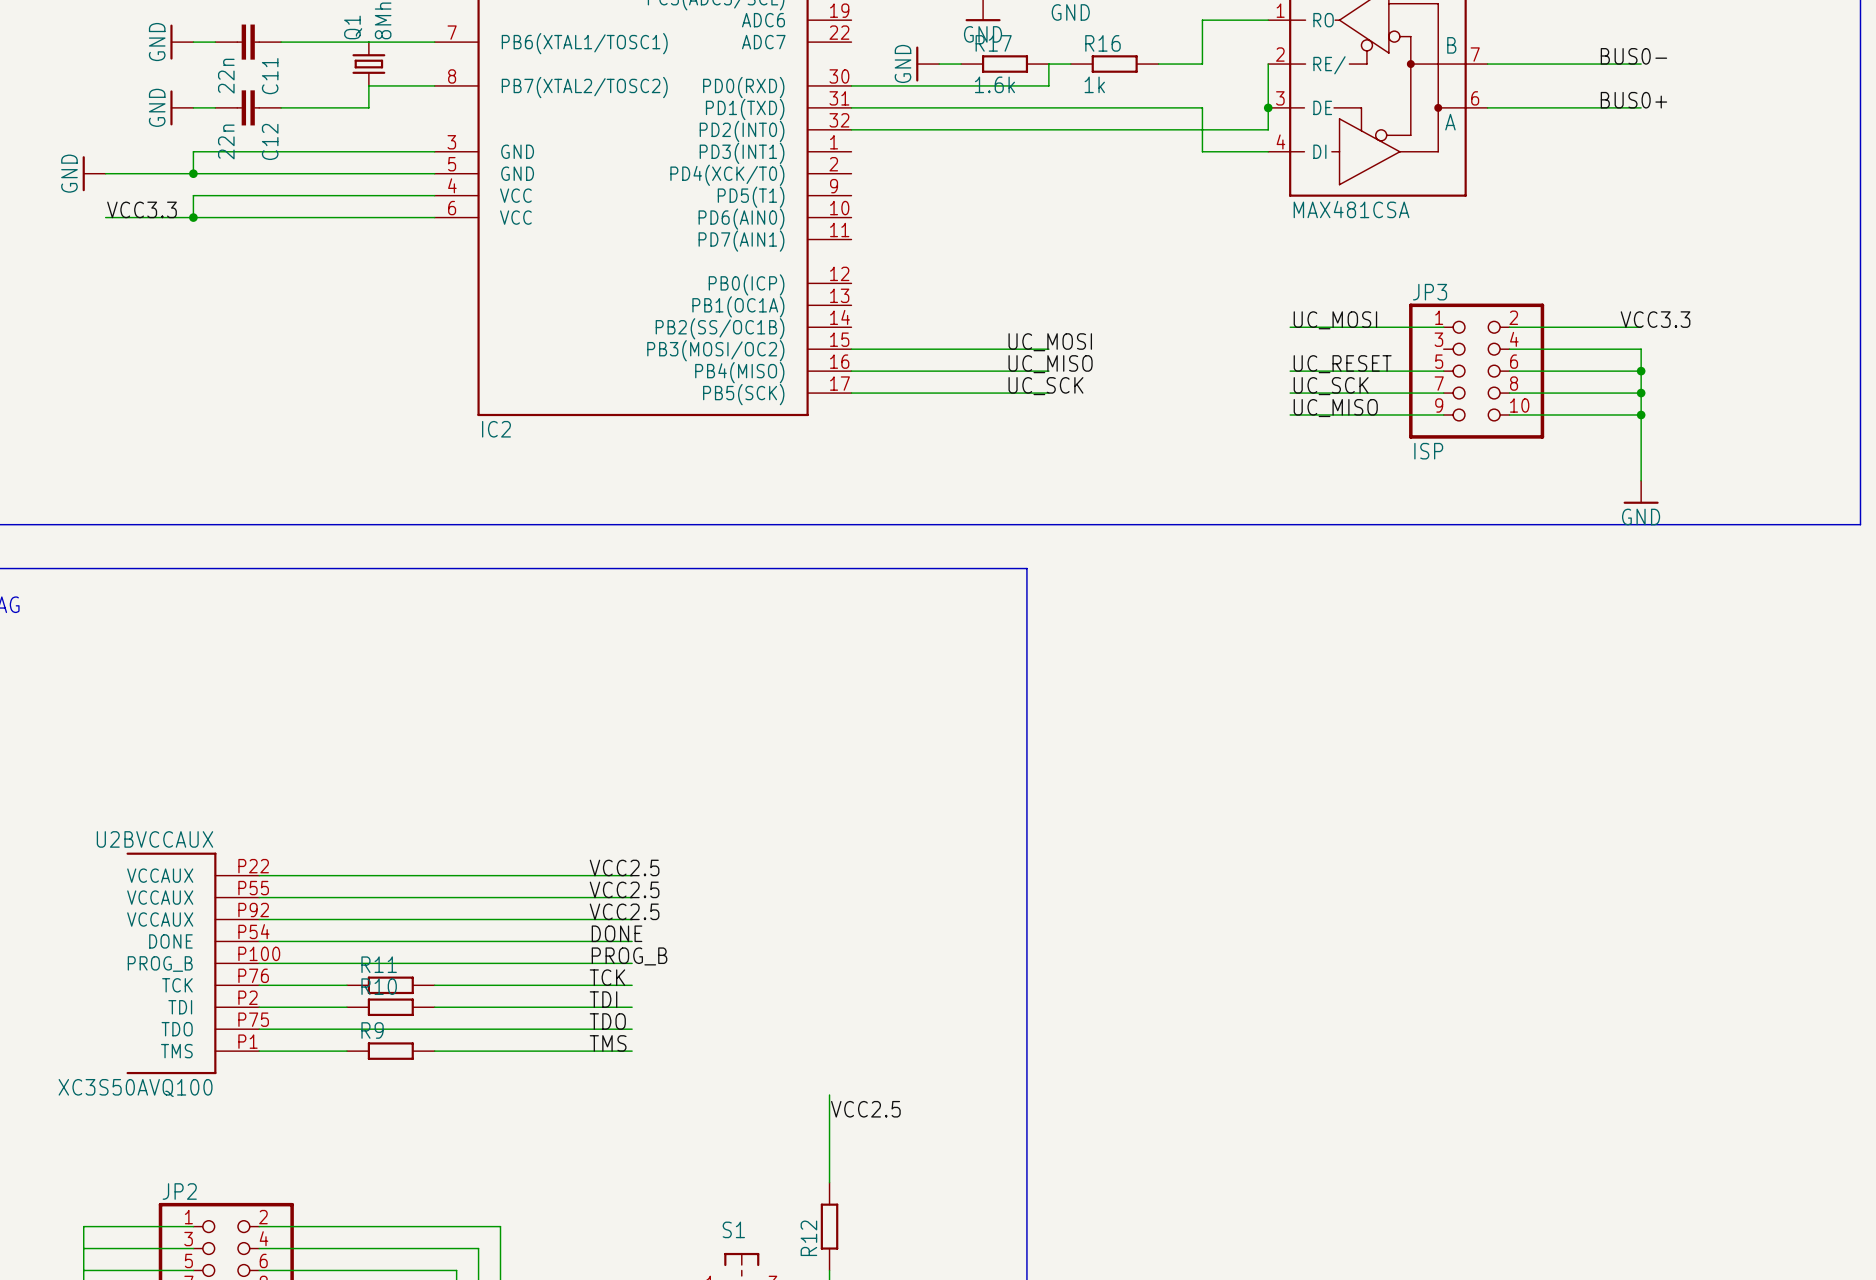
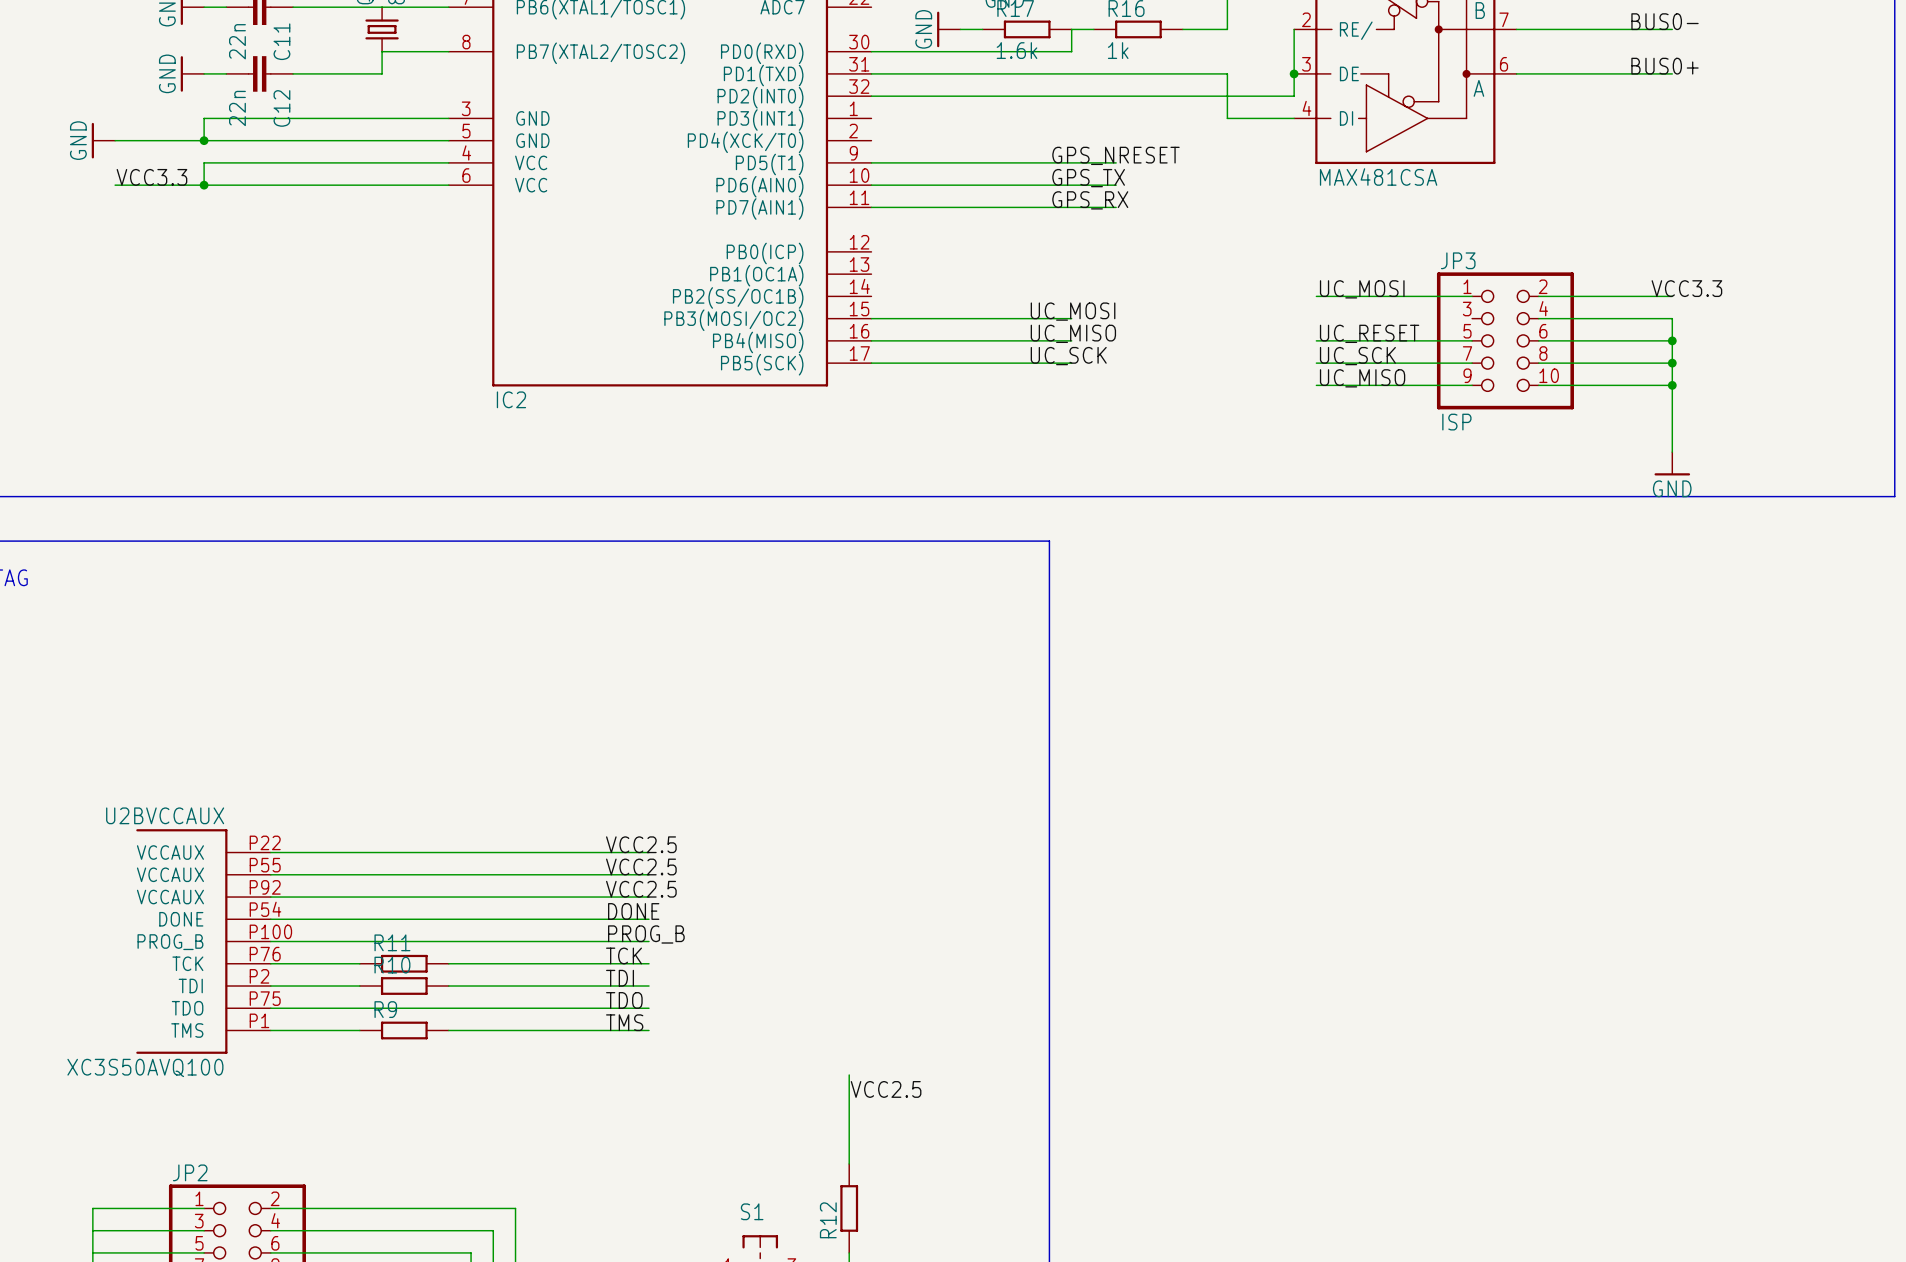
label: none -> GPS_NRESET (1115, 155)
wire: none -> (871, 162) (1116, 162)
label: none -> GPS_TX (1088, 178)
wire: none -> (871, 185) (1116, 185)
label: none -> GPS_RX (1090, 200)
wire: none -> (871, 207) (1116, 207)

